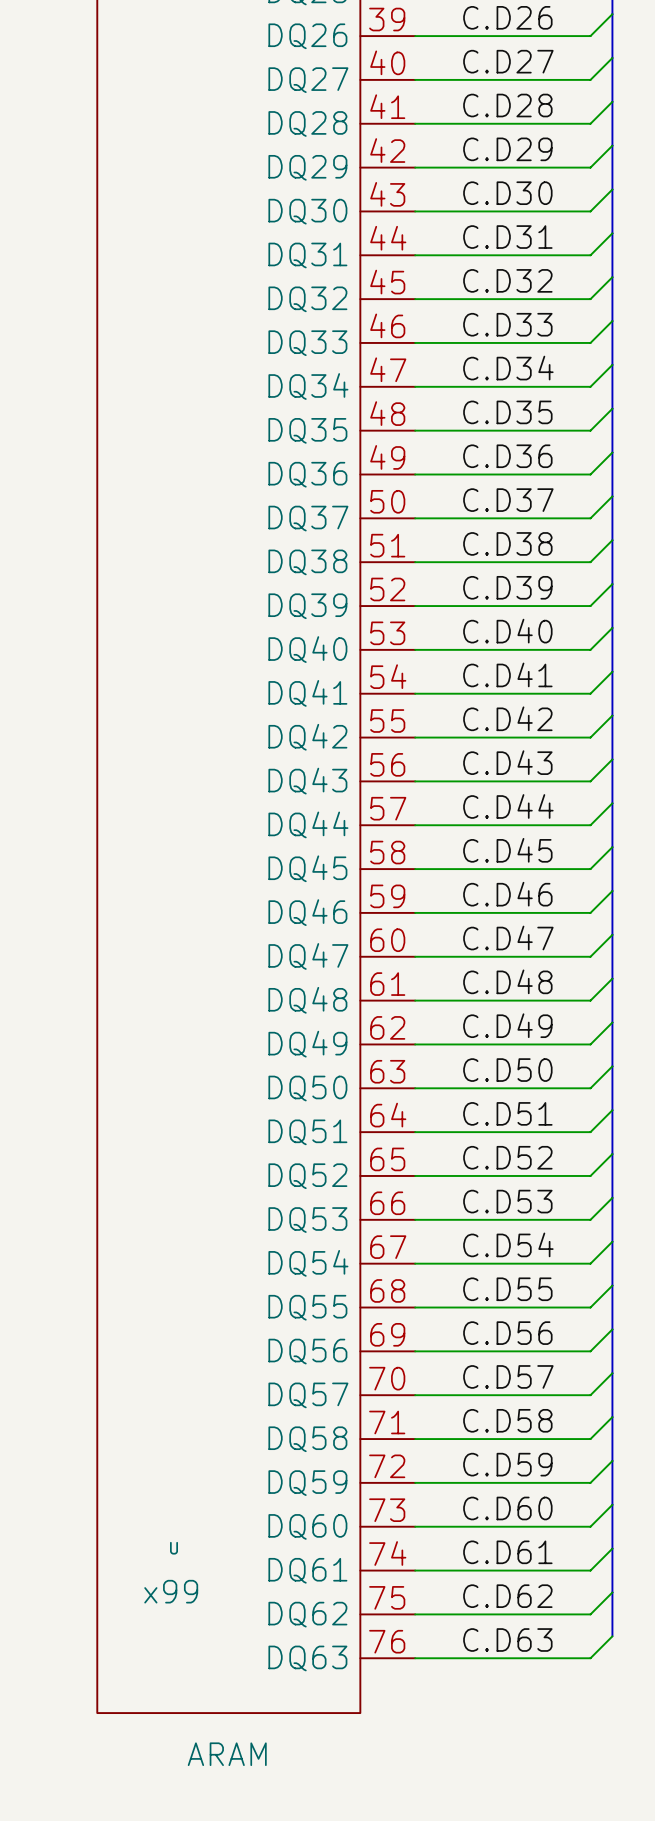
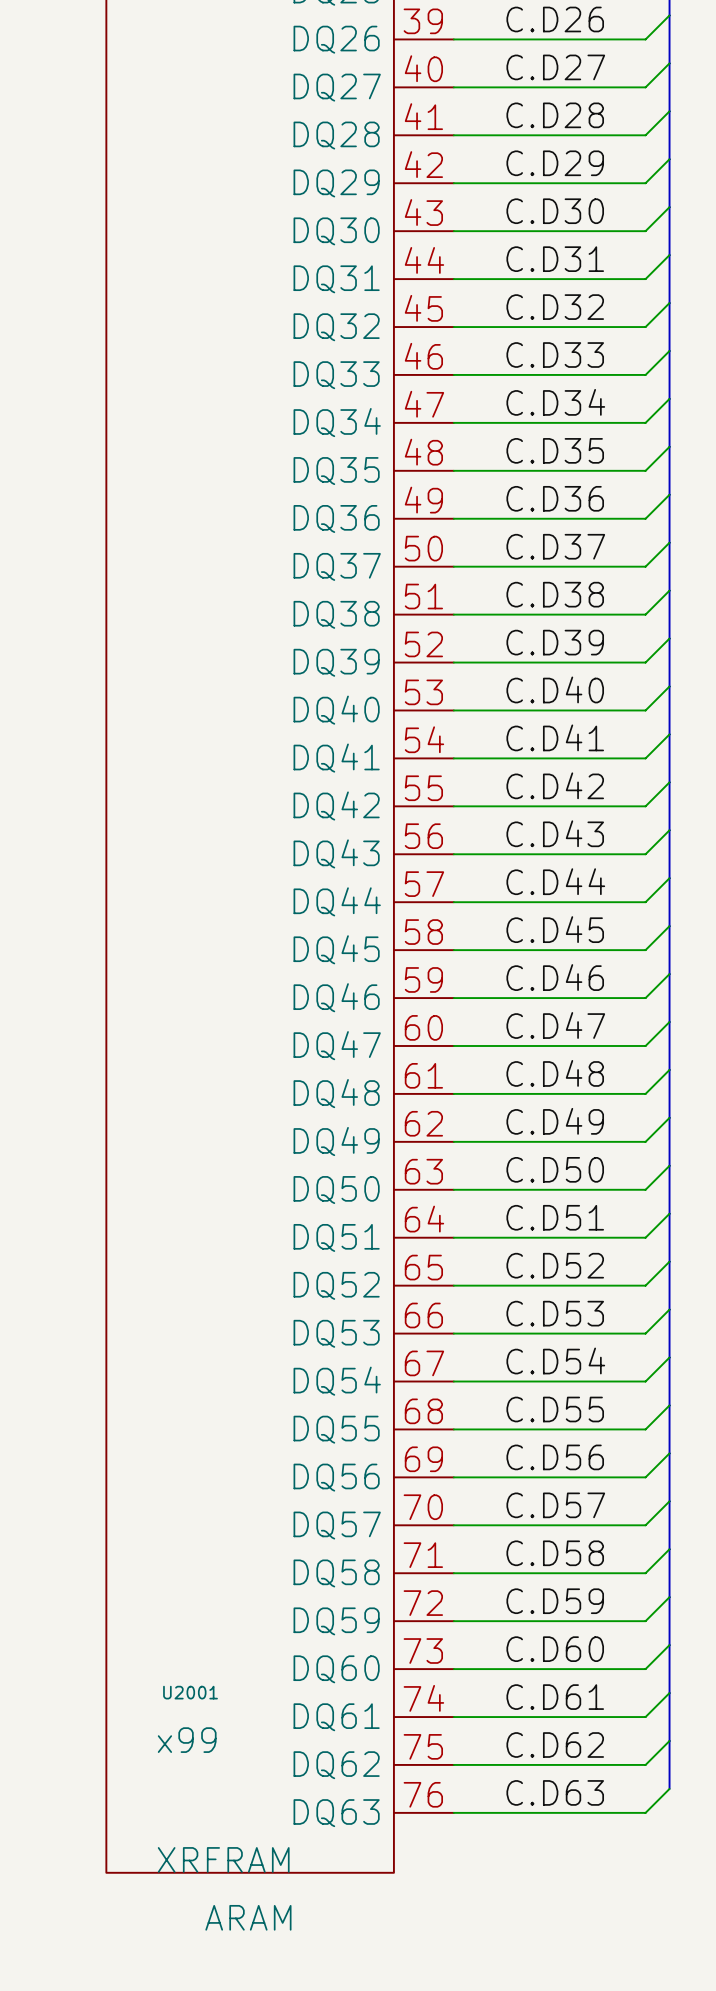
U name: U (174, 1548) -> U2001 (190, 1692)
U value: none -> XRFRAM (223, 1859)

